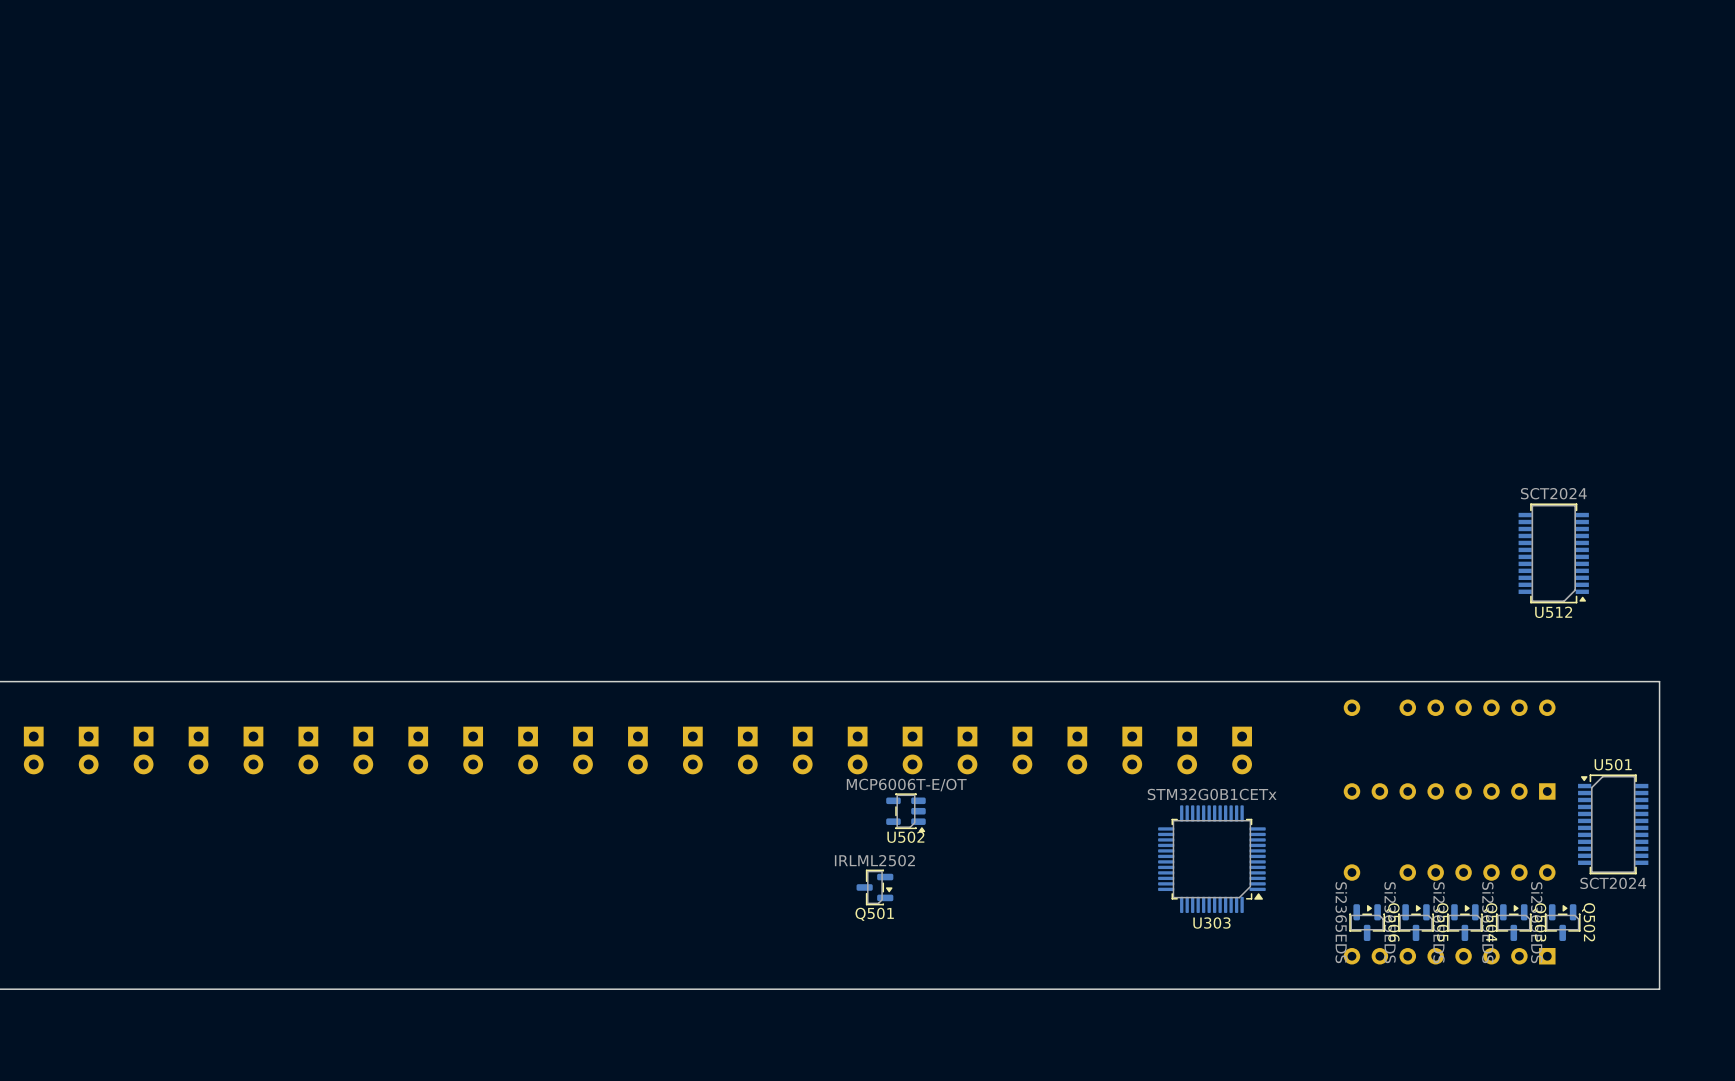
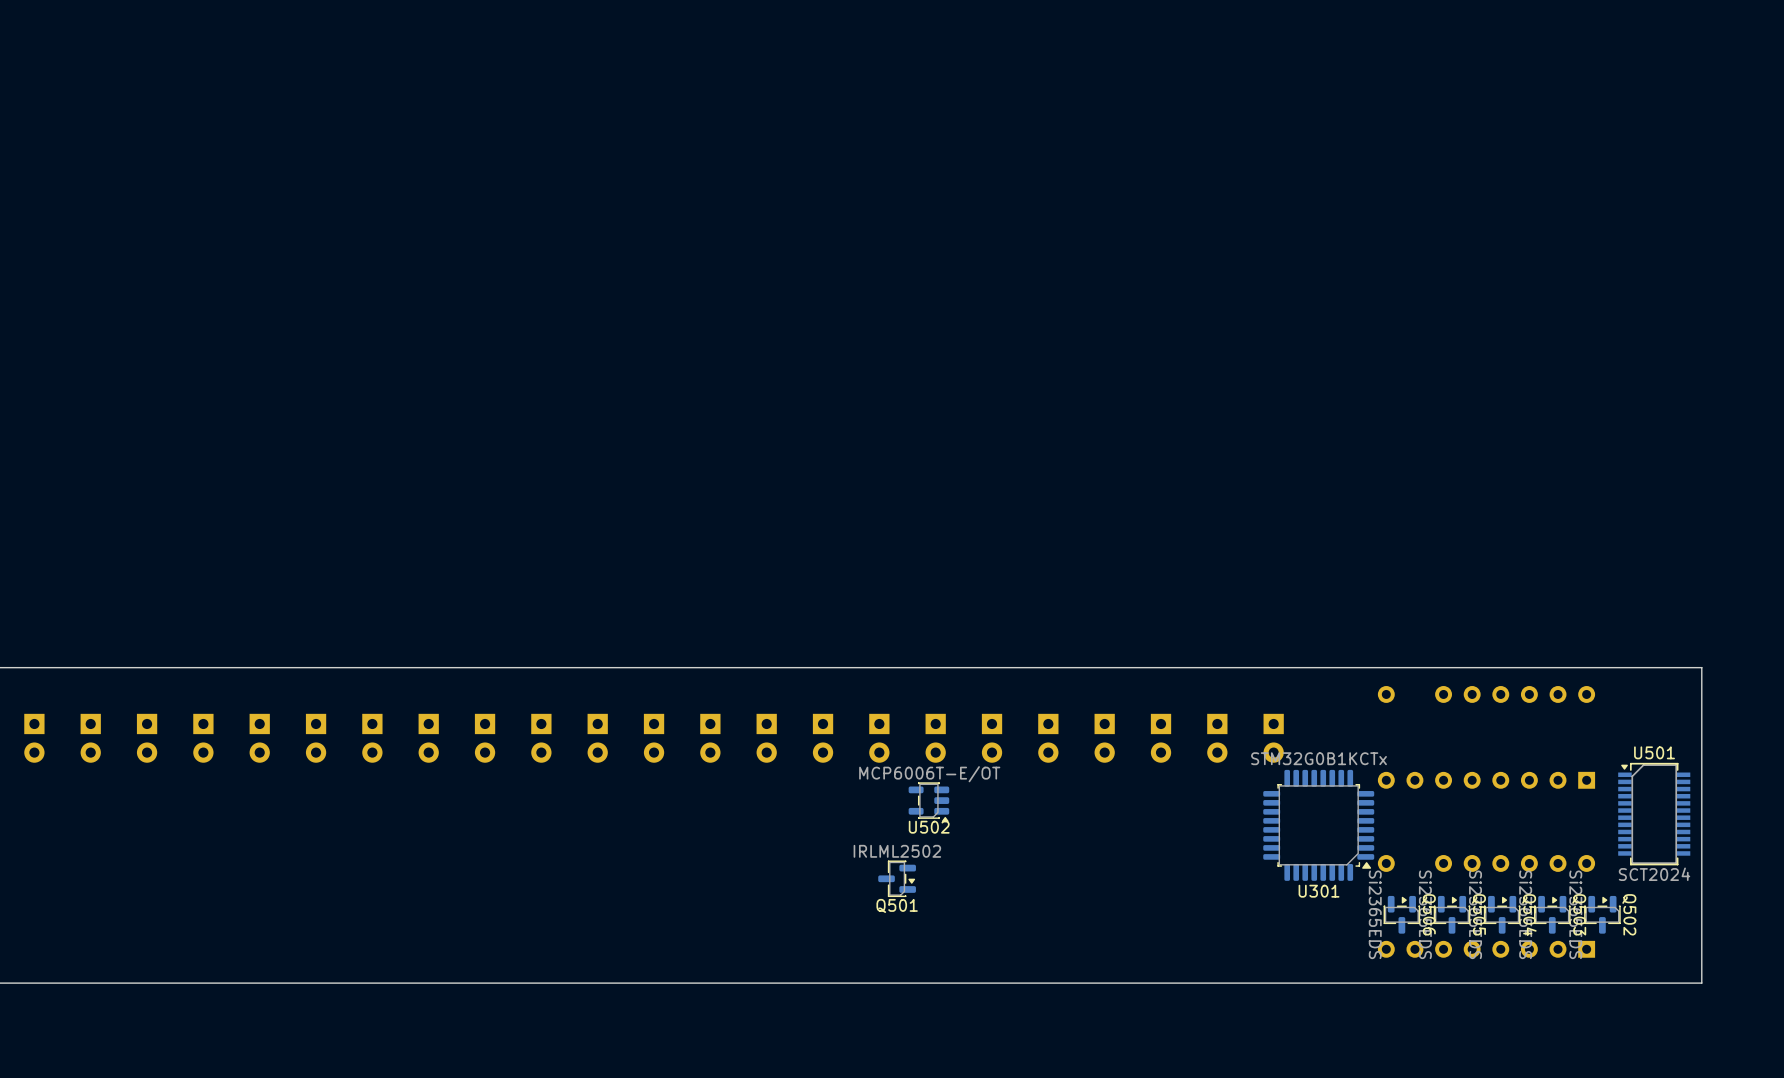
U512: SCT2024 (1553, 553) -> none
U301: none -> STM32G0B1KCTx (1318, 825)
U303: STM32G0B1CETx (1211, 859) -> none

